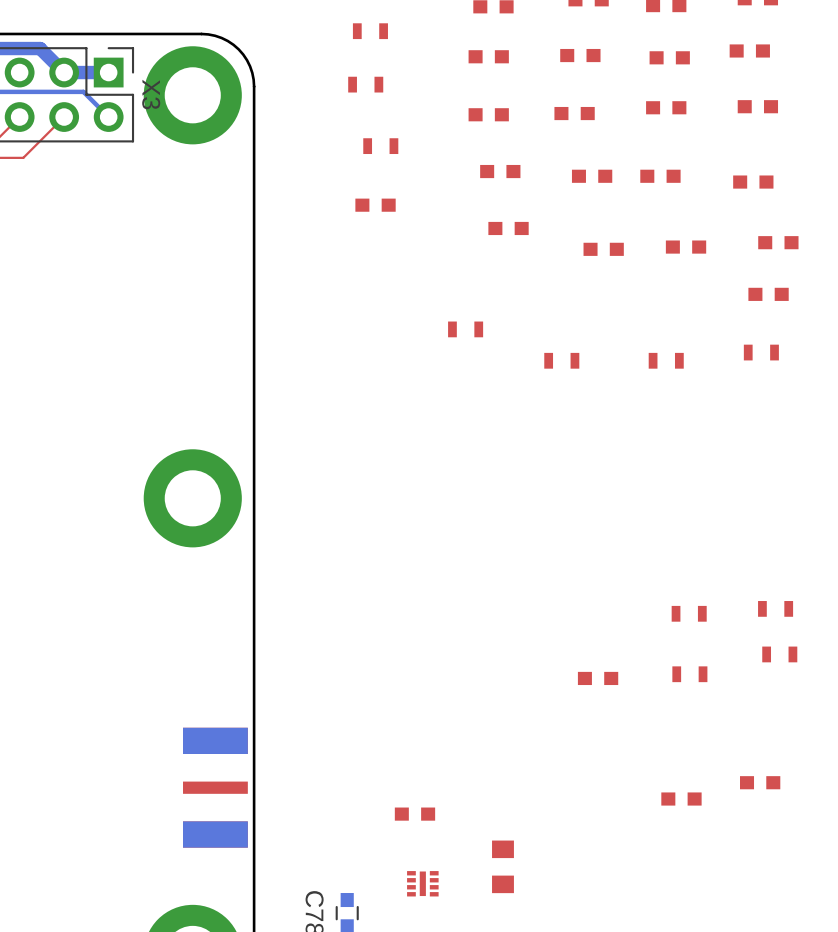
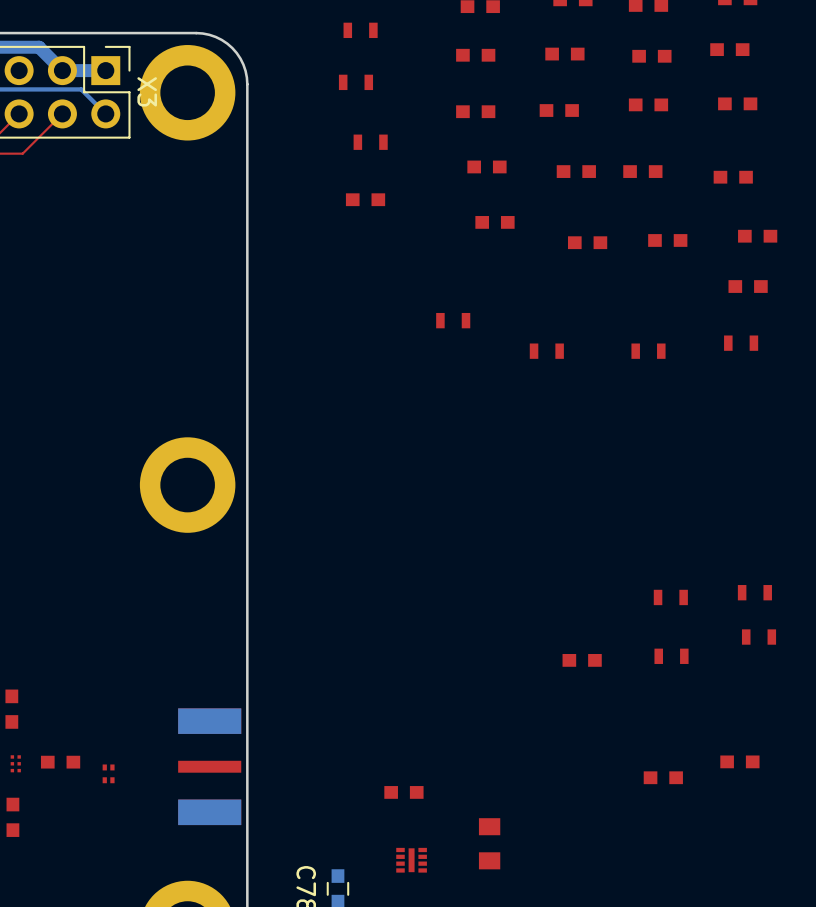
part: none -> (11, 709)
part: none -> (60, 762)
part: none -> (15, 763)
part: none -> (108, 773)
part: none -> (12, 817)

